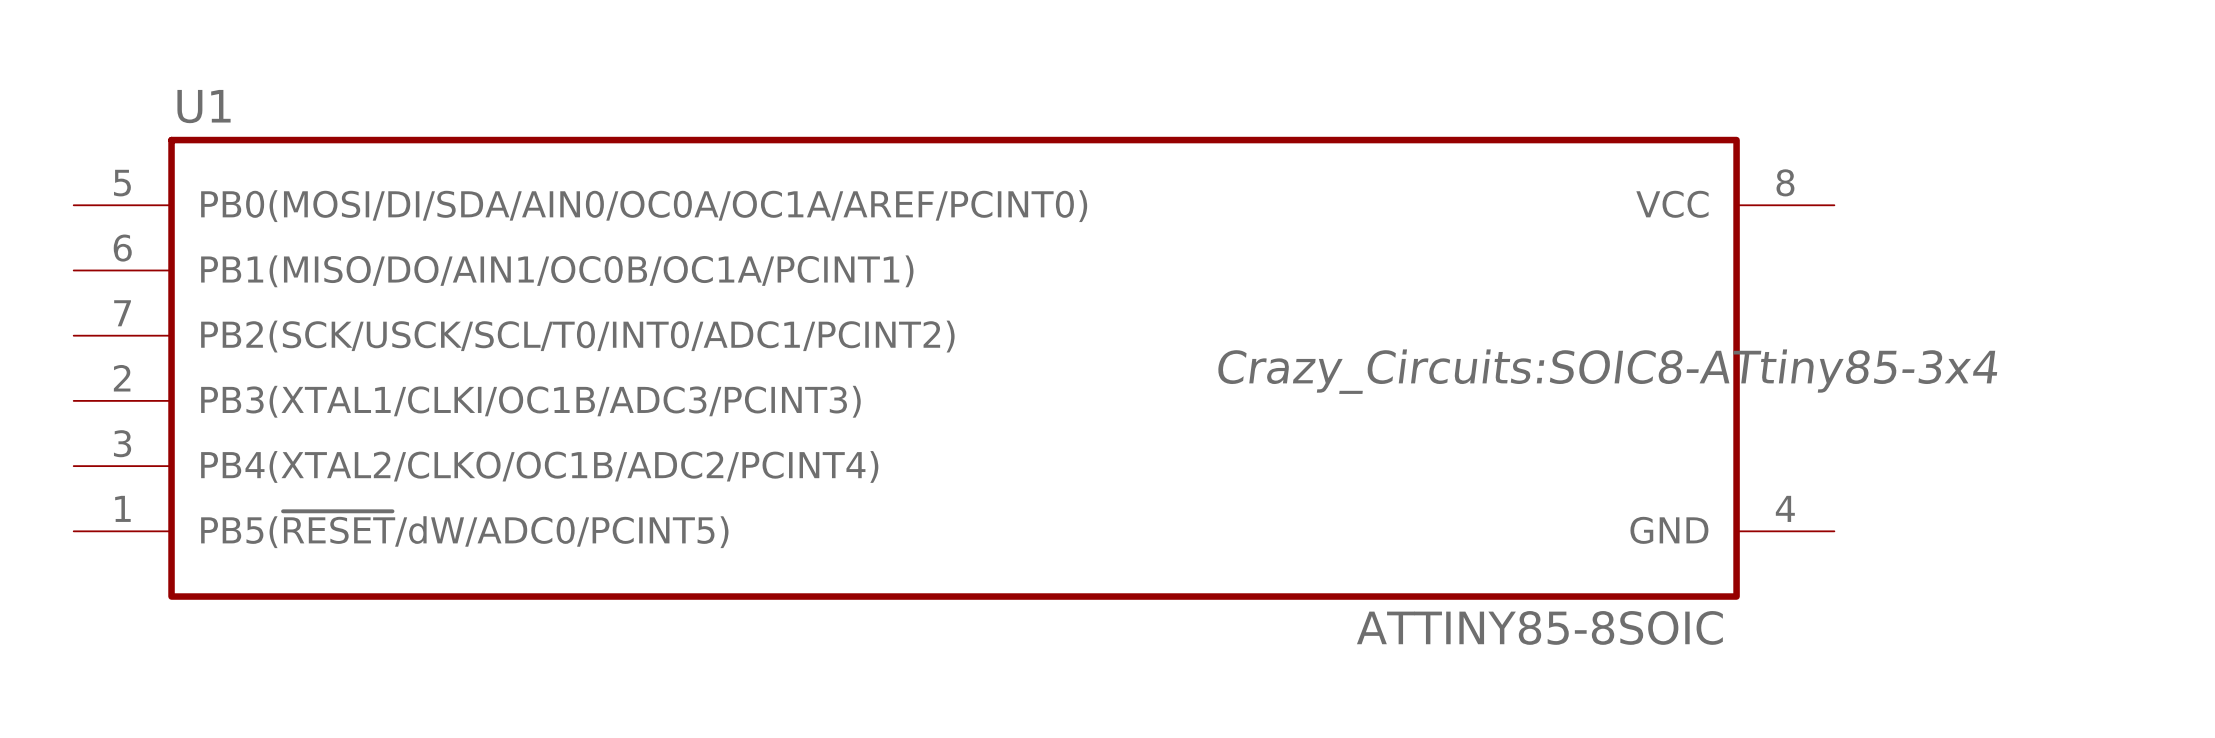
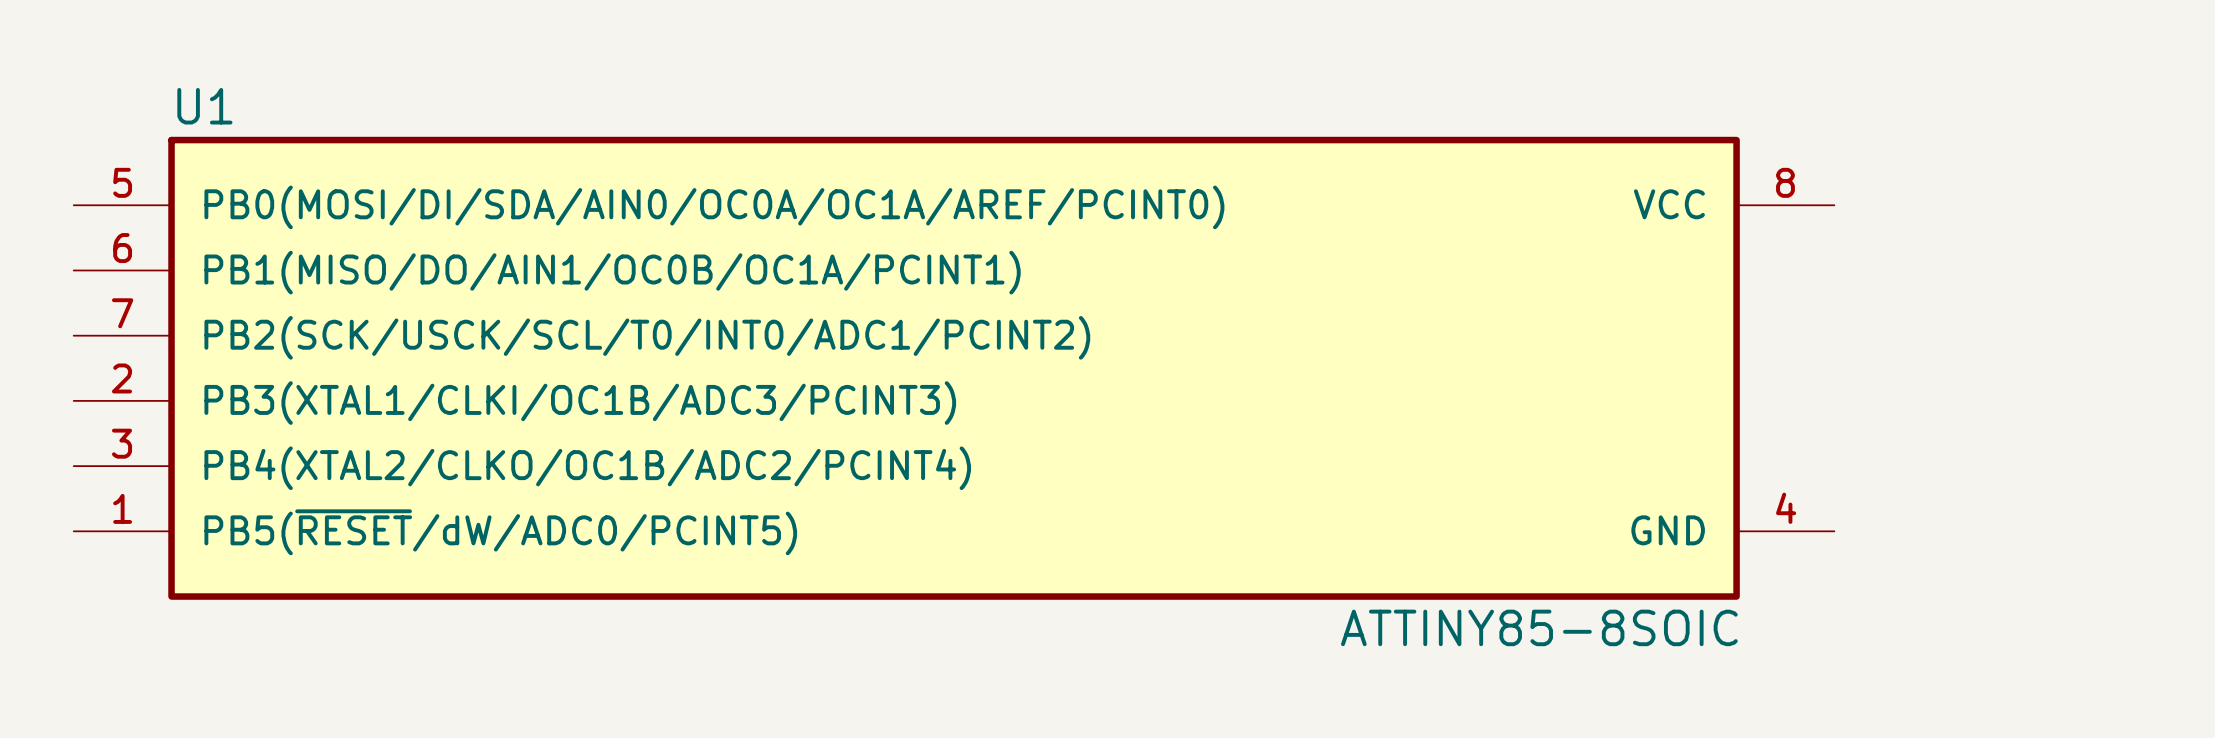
U1 text: Crazy_Circuits:SOIC8-ATtiny85-3x4 (1607, 371) -> none

